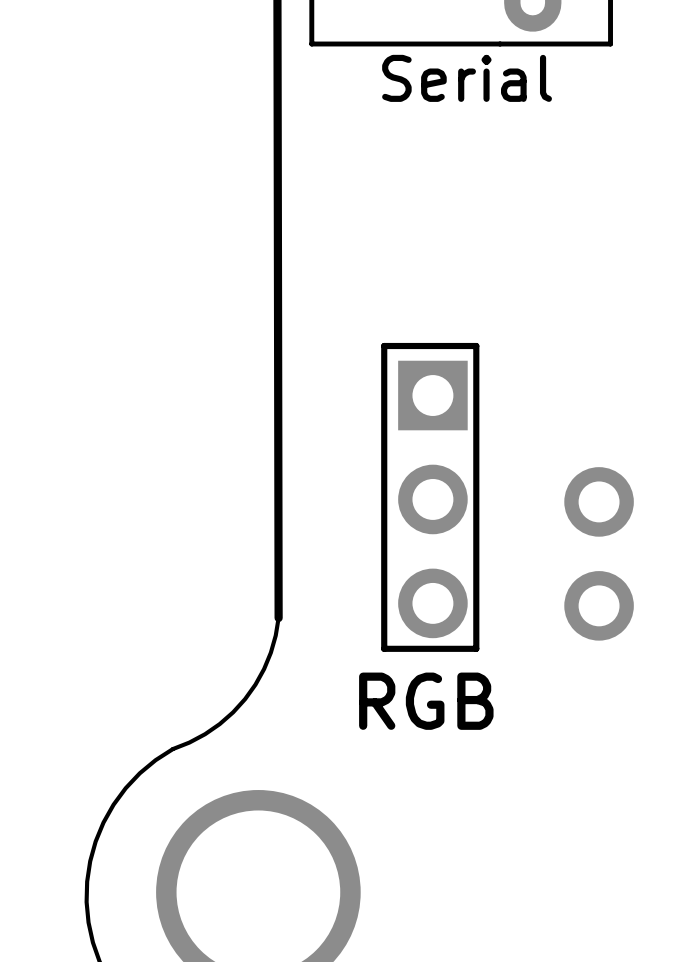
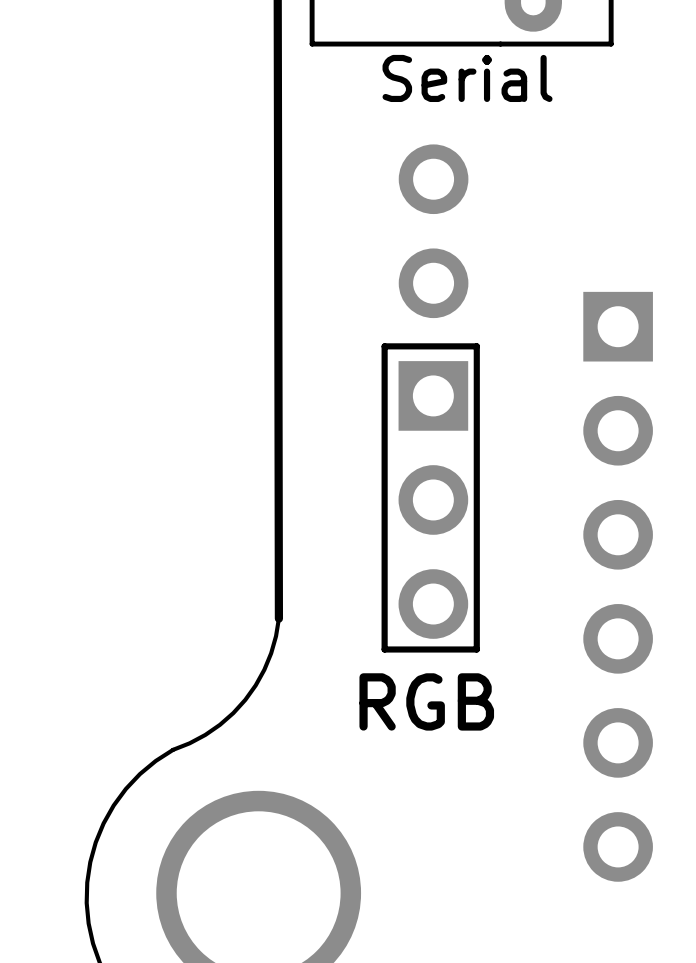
part: none -> (433, 231)
part footprint: [564, 467, 634, 641] -> [583, 291, 653, 882]

